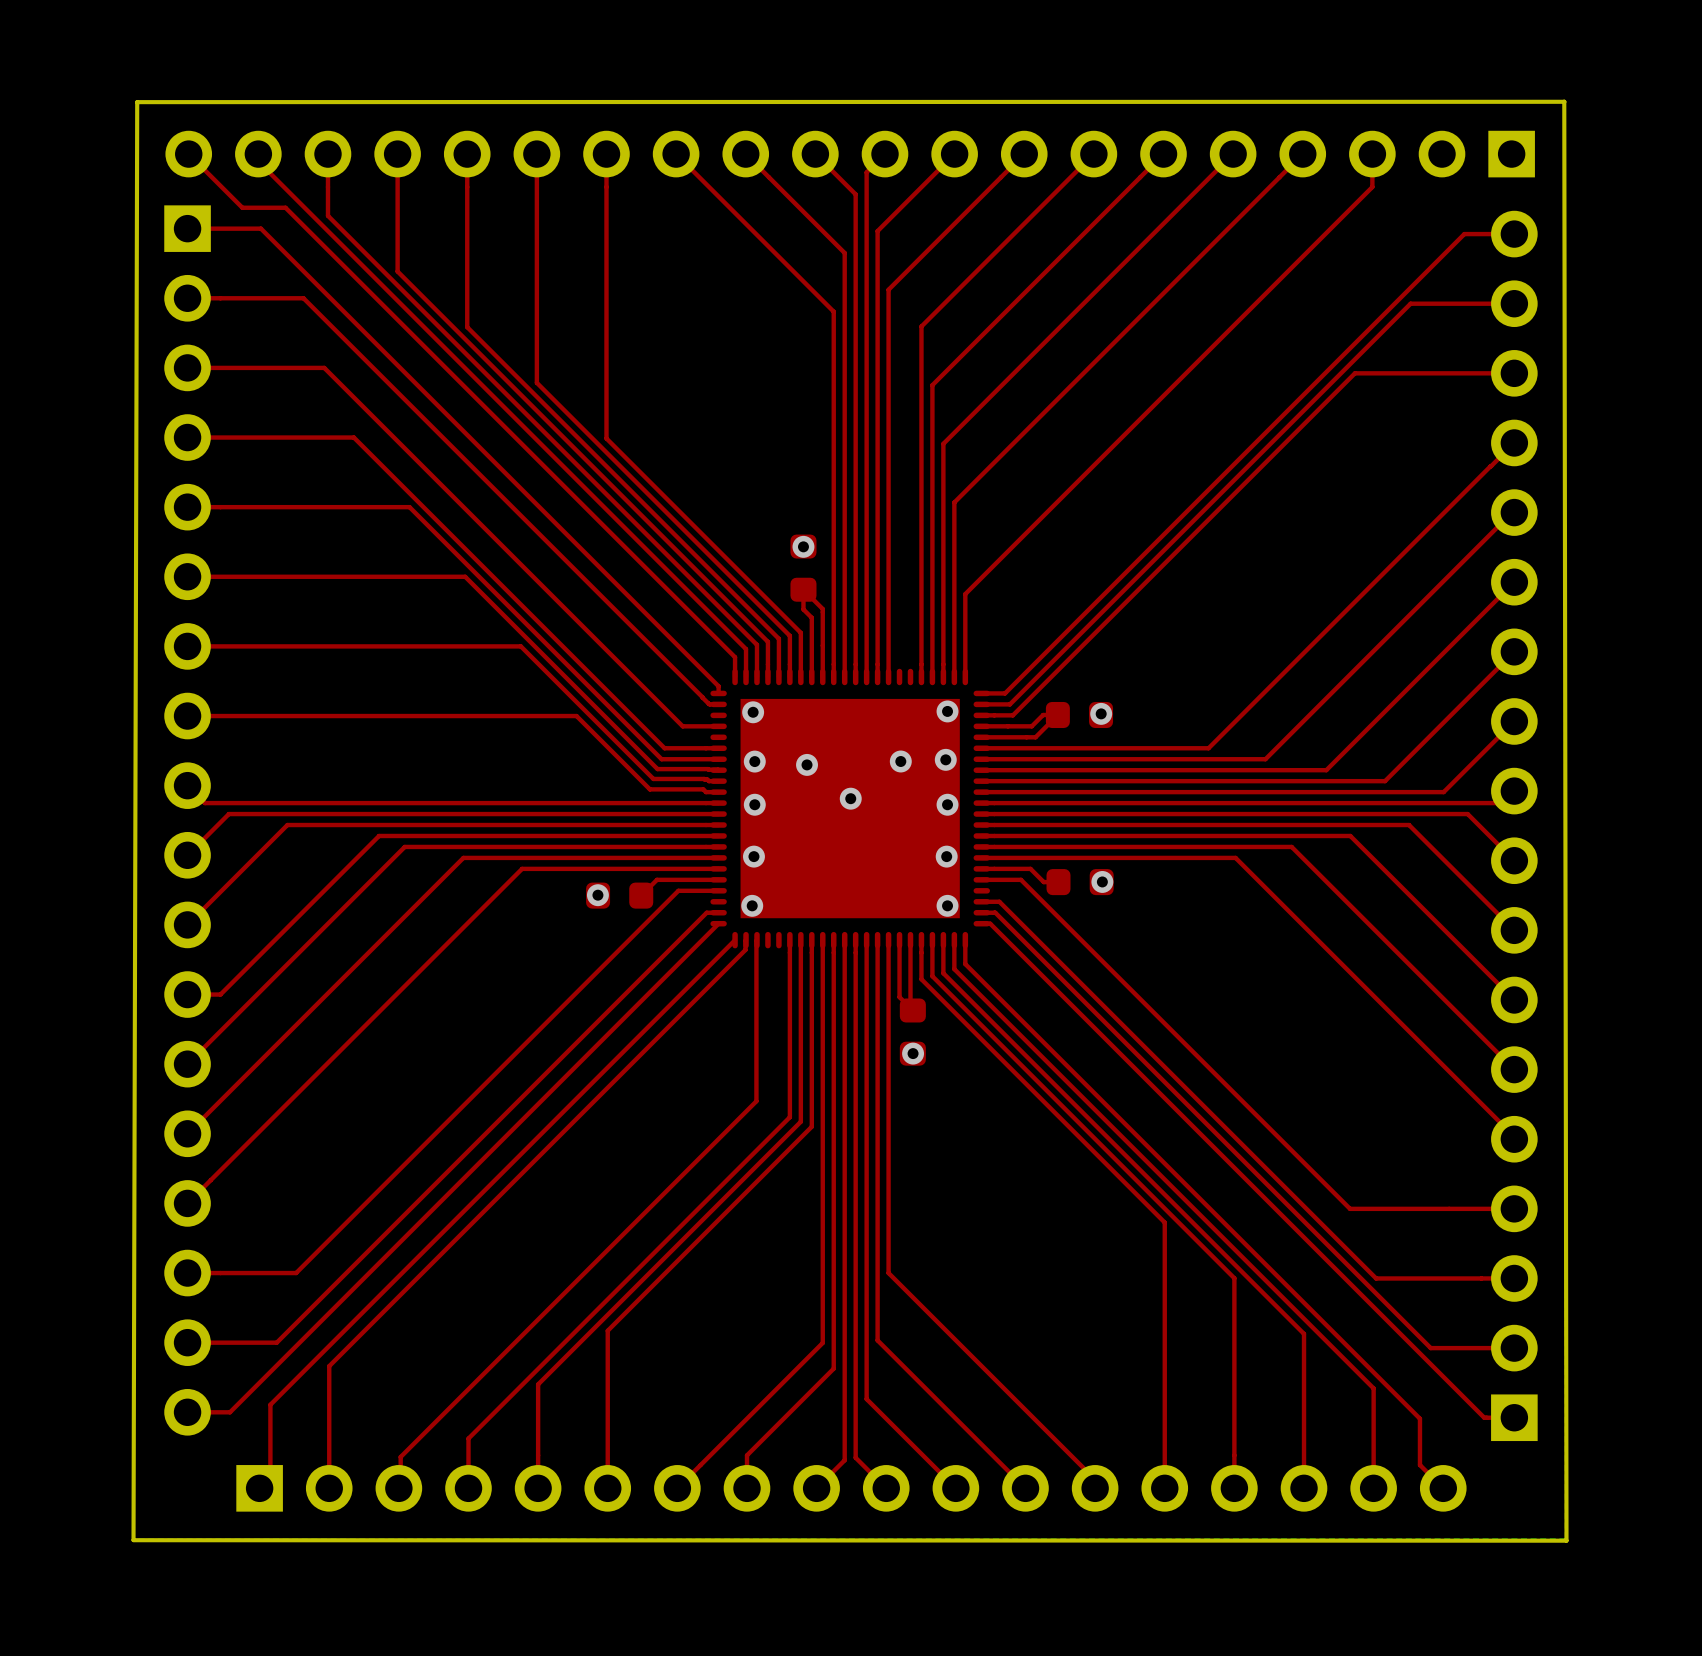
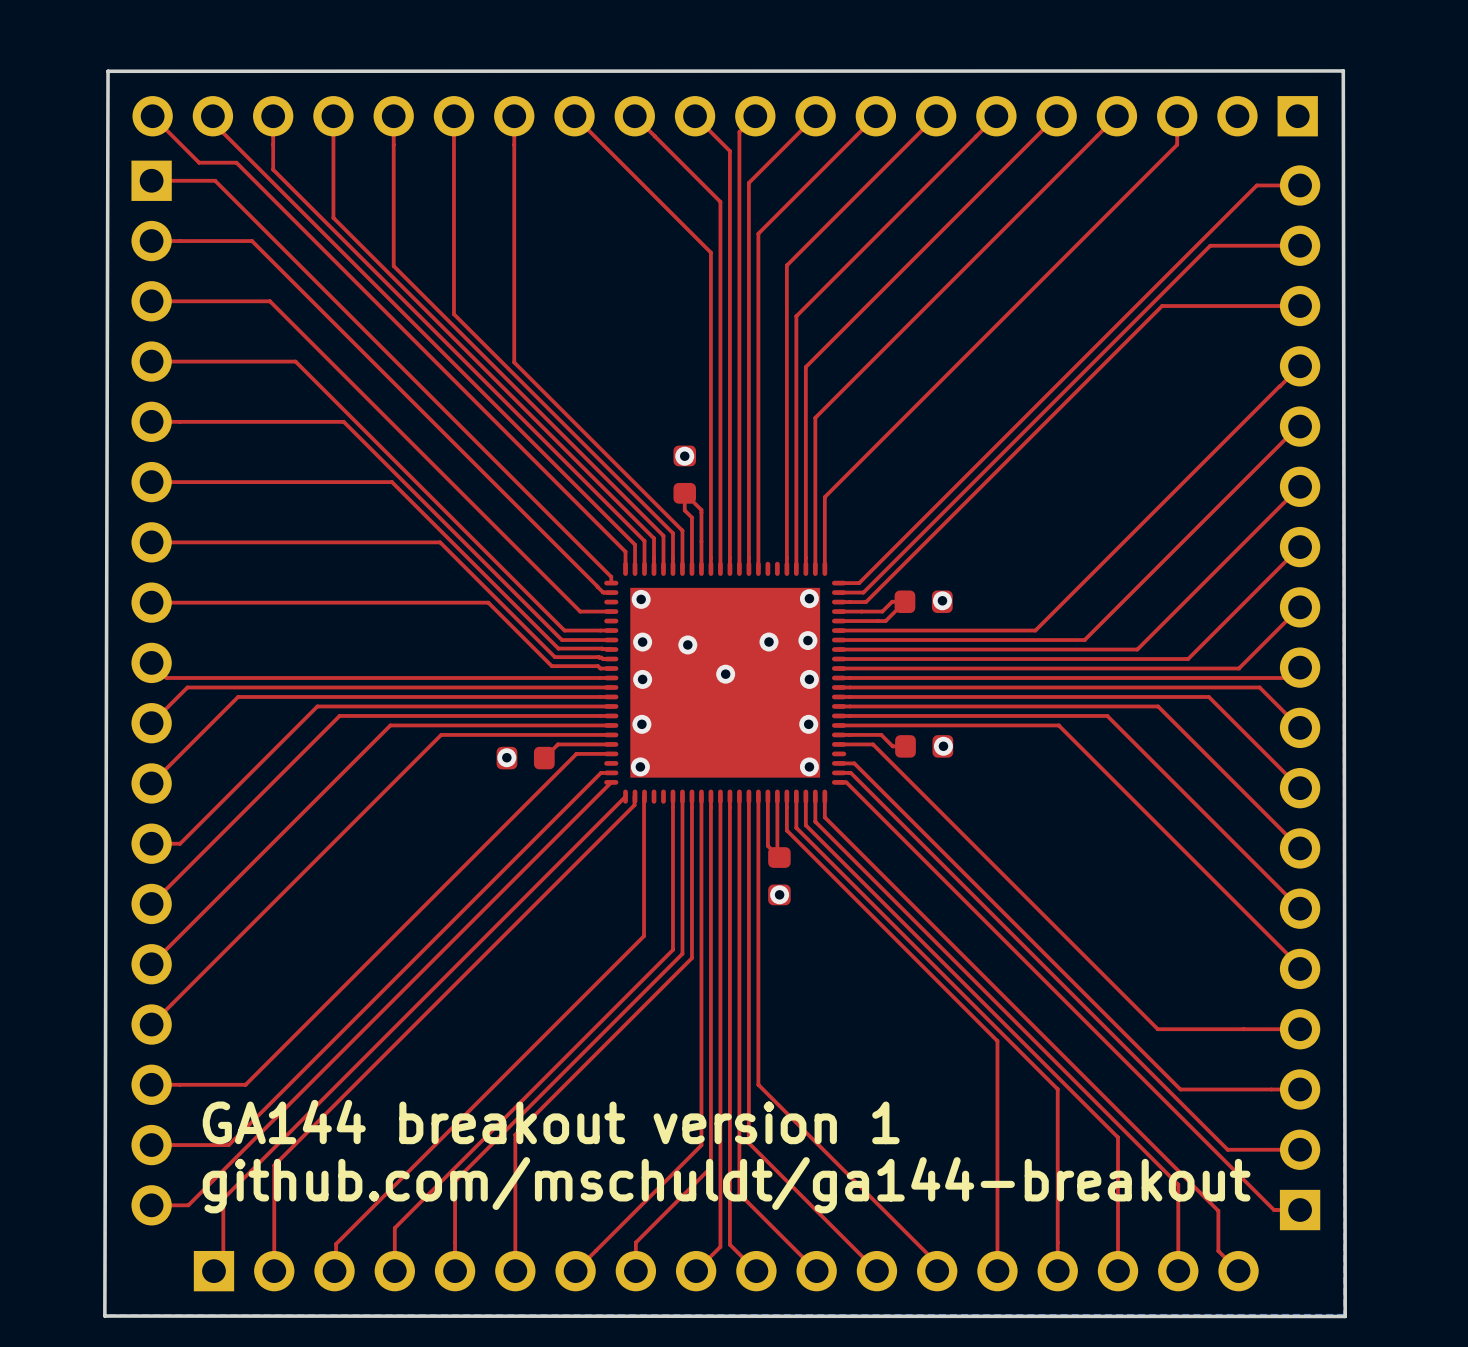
text: none -> GA144 breakout version 1 (551, 1122)
text: none -> github.com/mschuldt/ga144-breakout (726, 1185)

